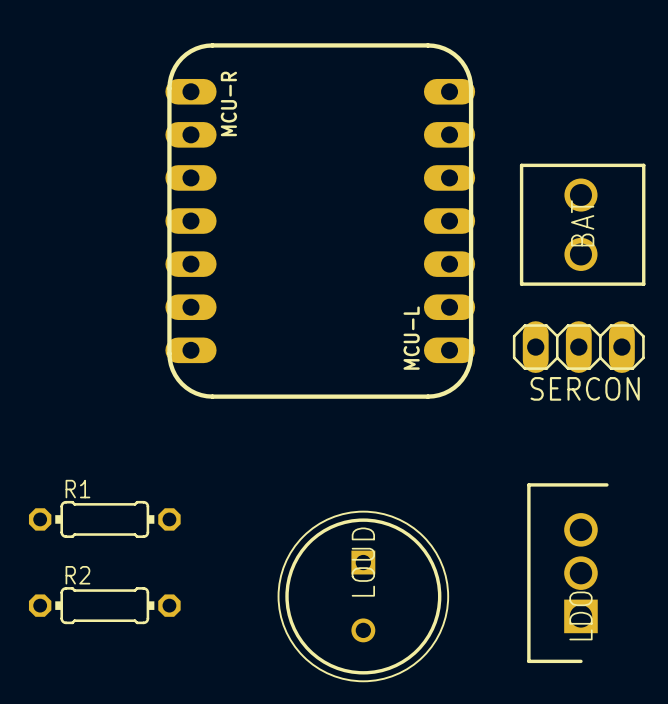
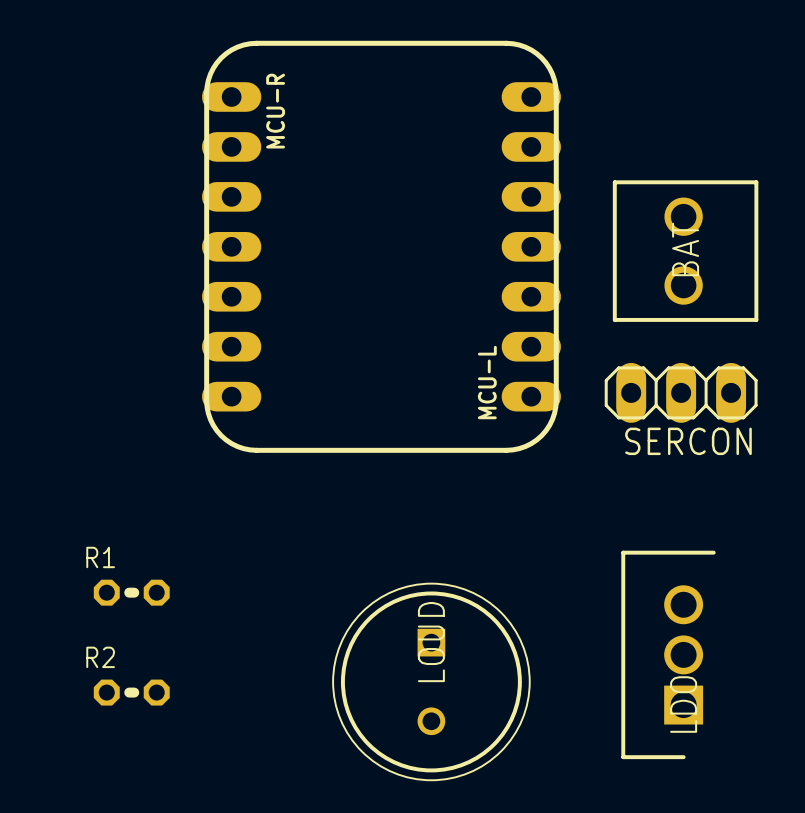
R1 footprint: [28, 500, 181, 538] -> [93, 579, 170, 606]
R2 footprint: [28, 587, 181, 625] -> [93, 679, 170, 706]

